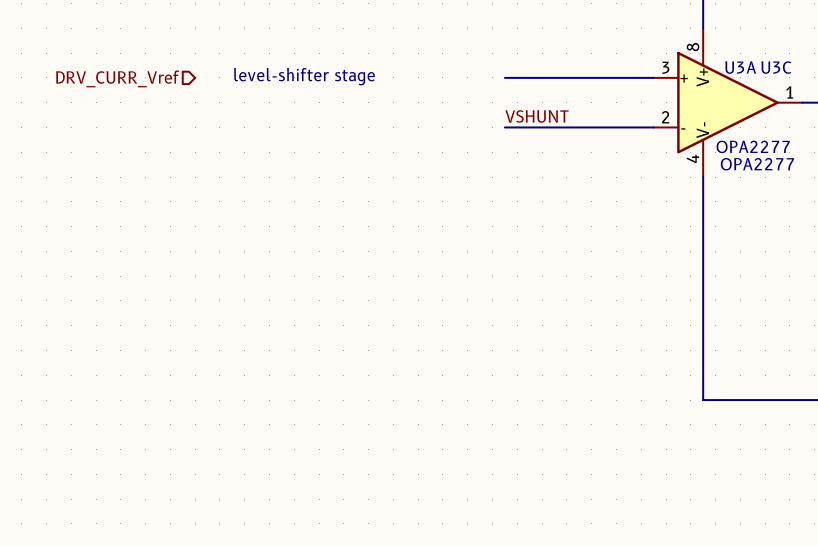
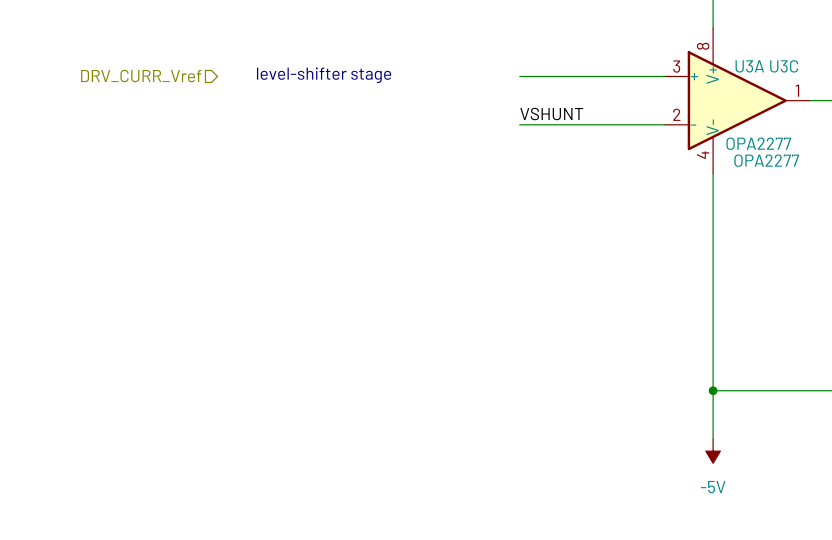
wire: none -> (713, 390) (713, 439)
junction: none -> (713, 390)
power symbol: none -> -5V (713, 451)

